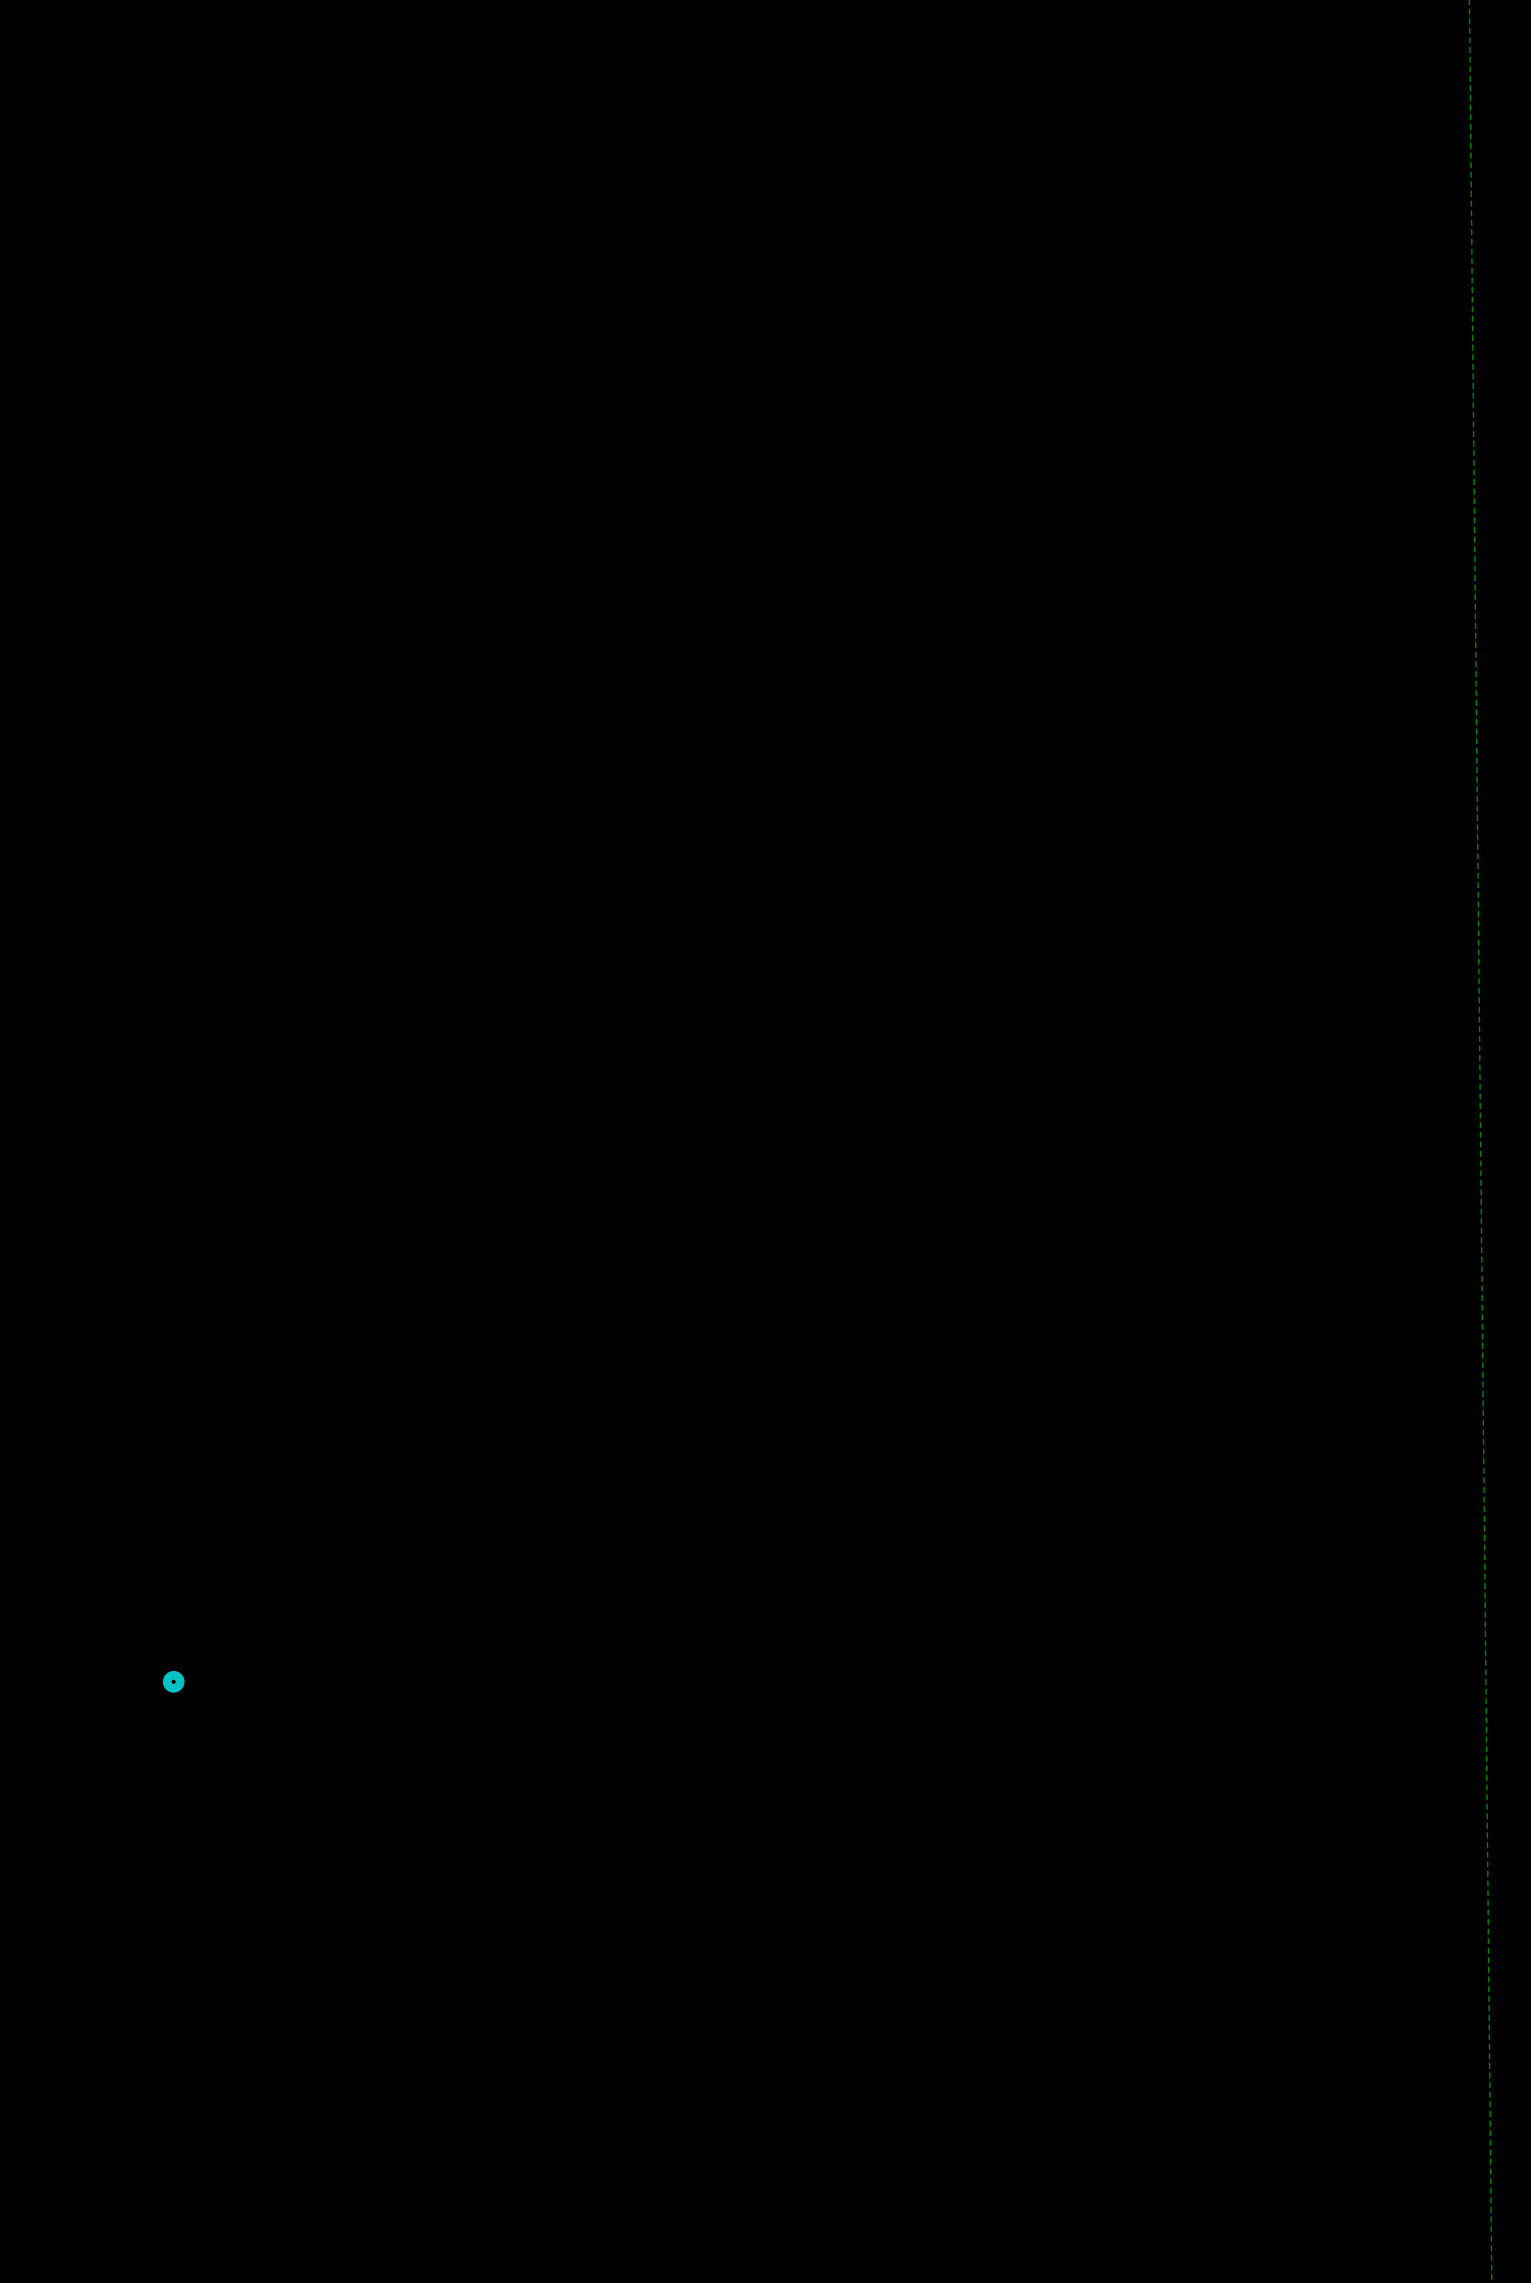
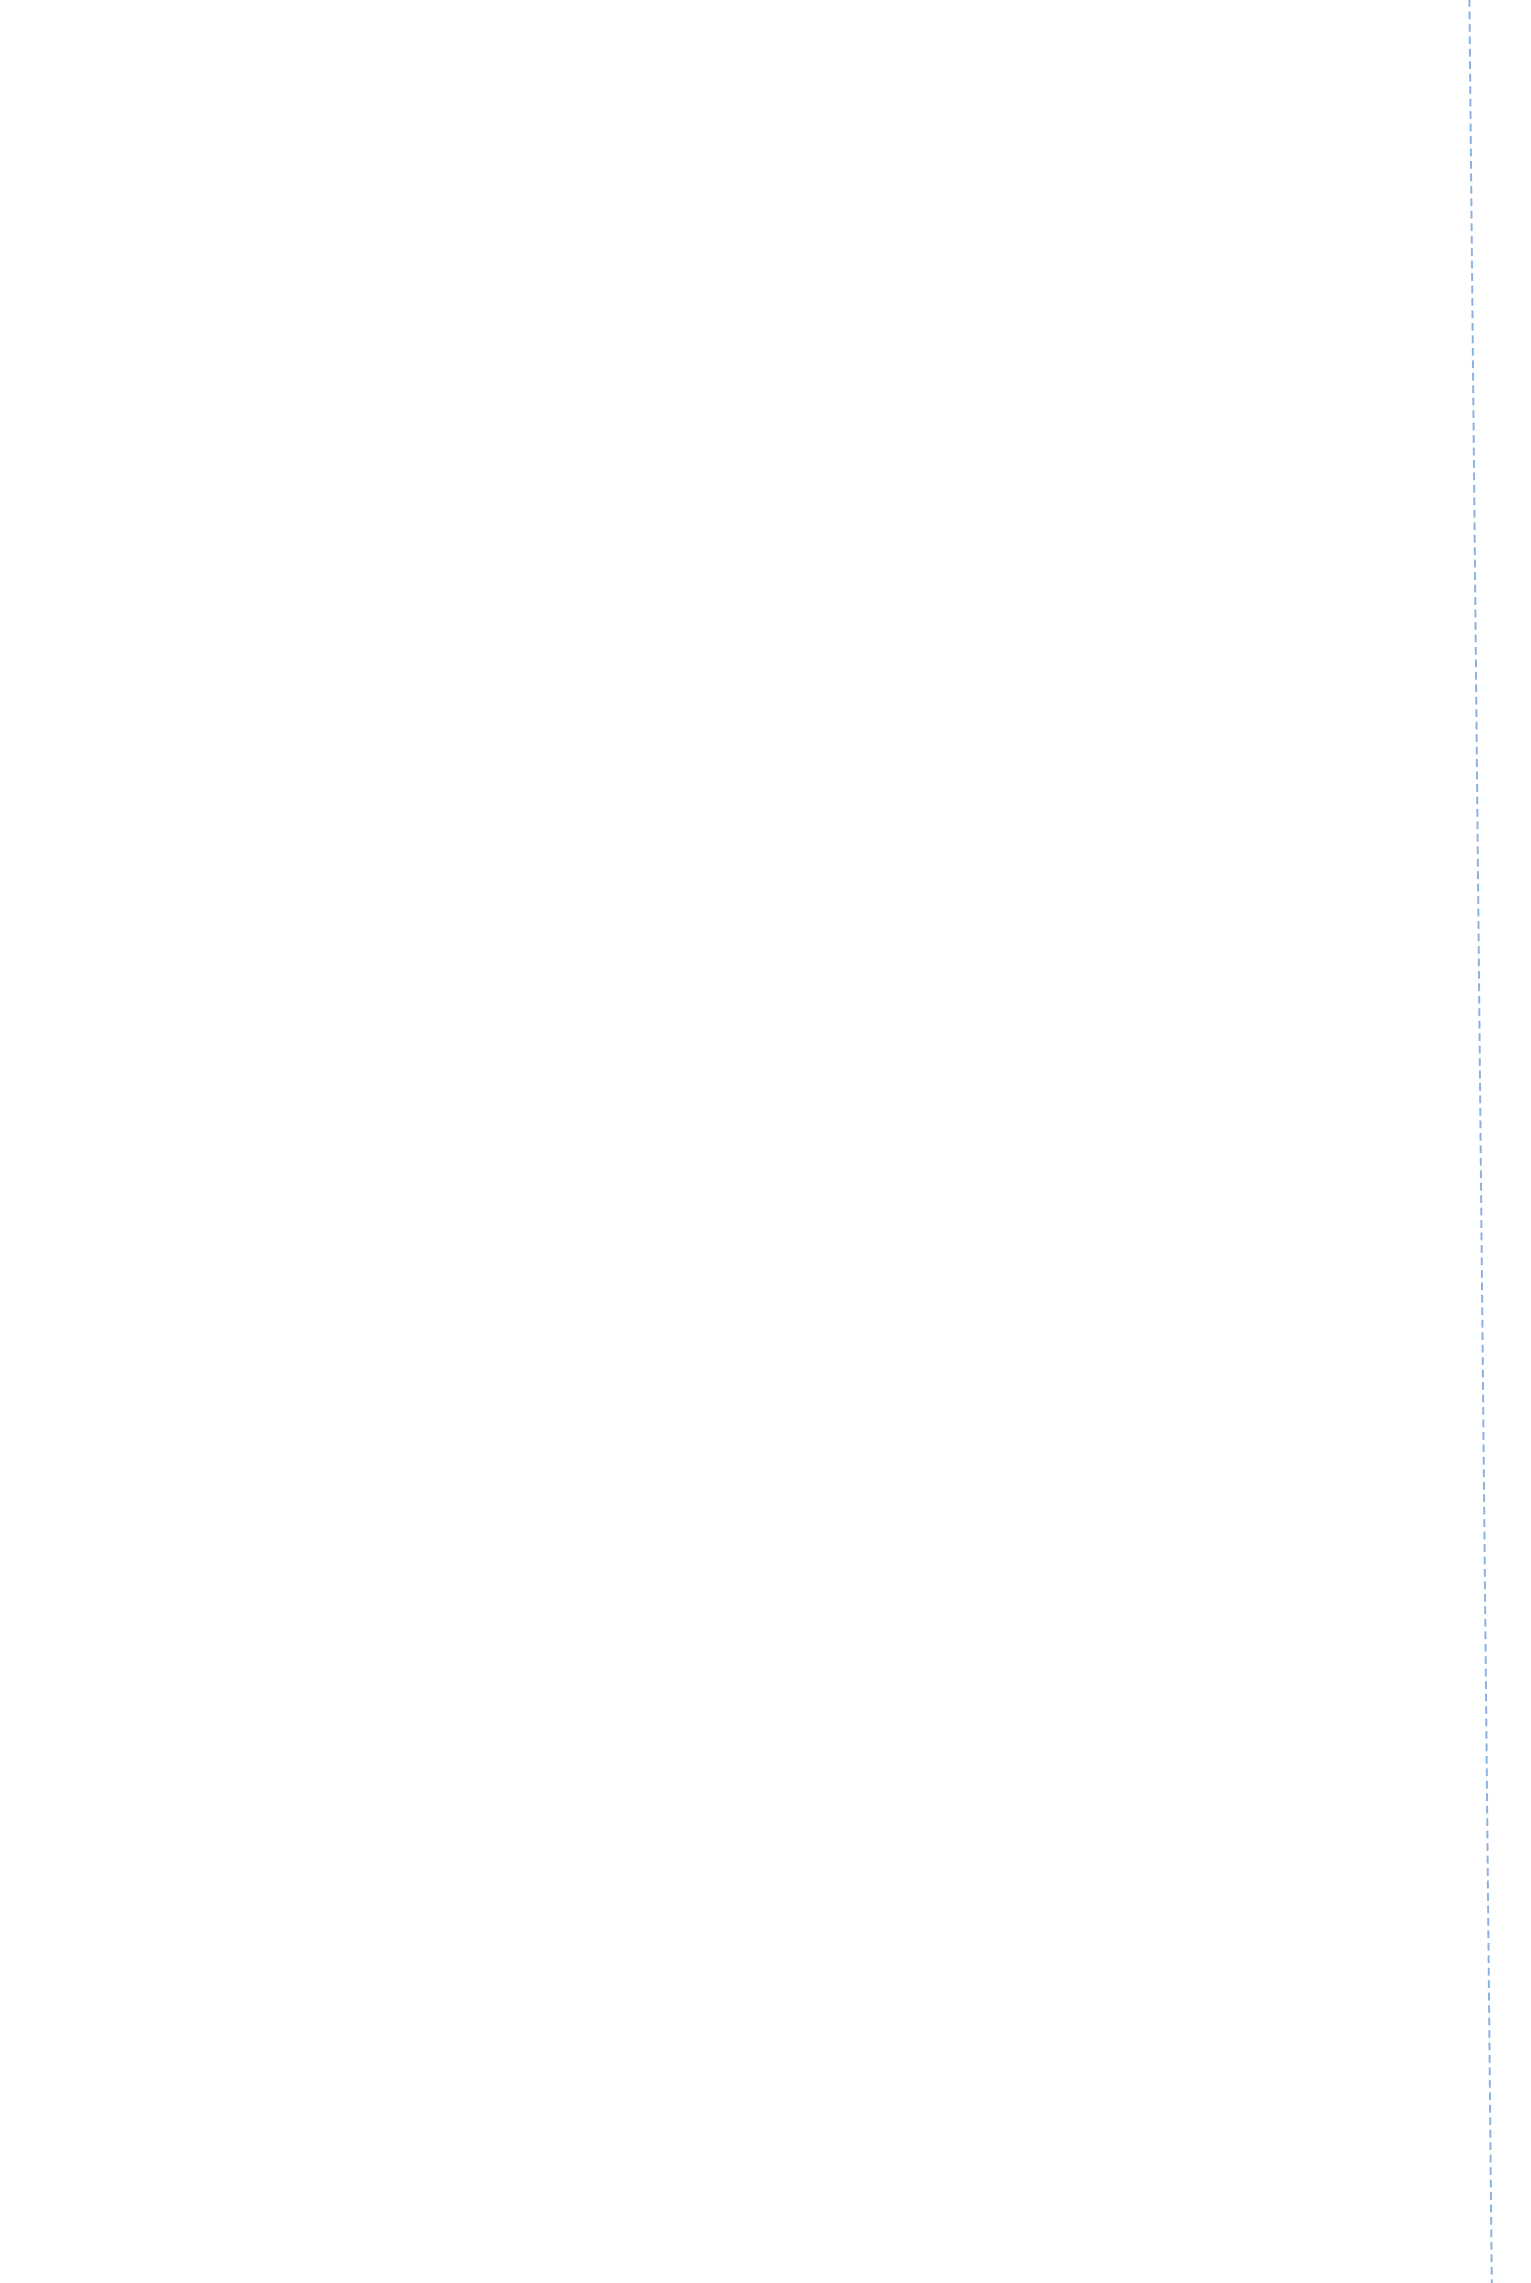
part: (173, 1681) -> none

